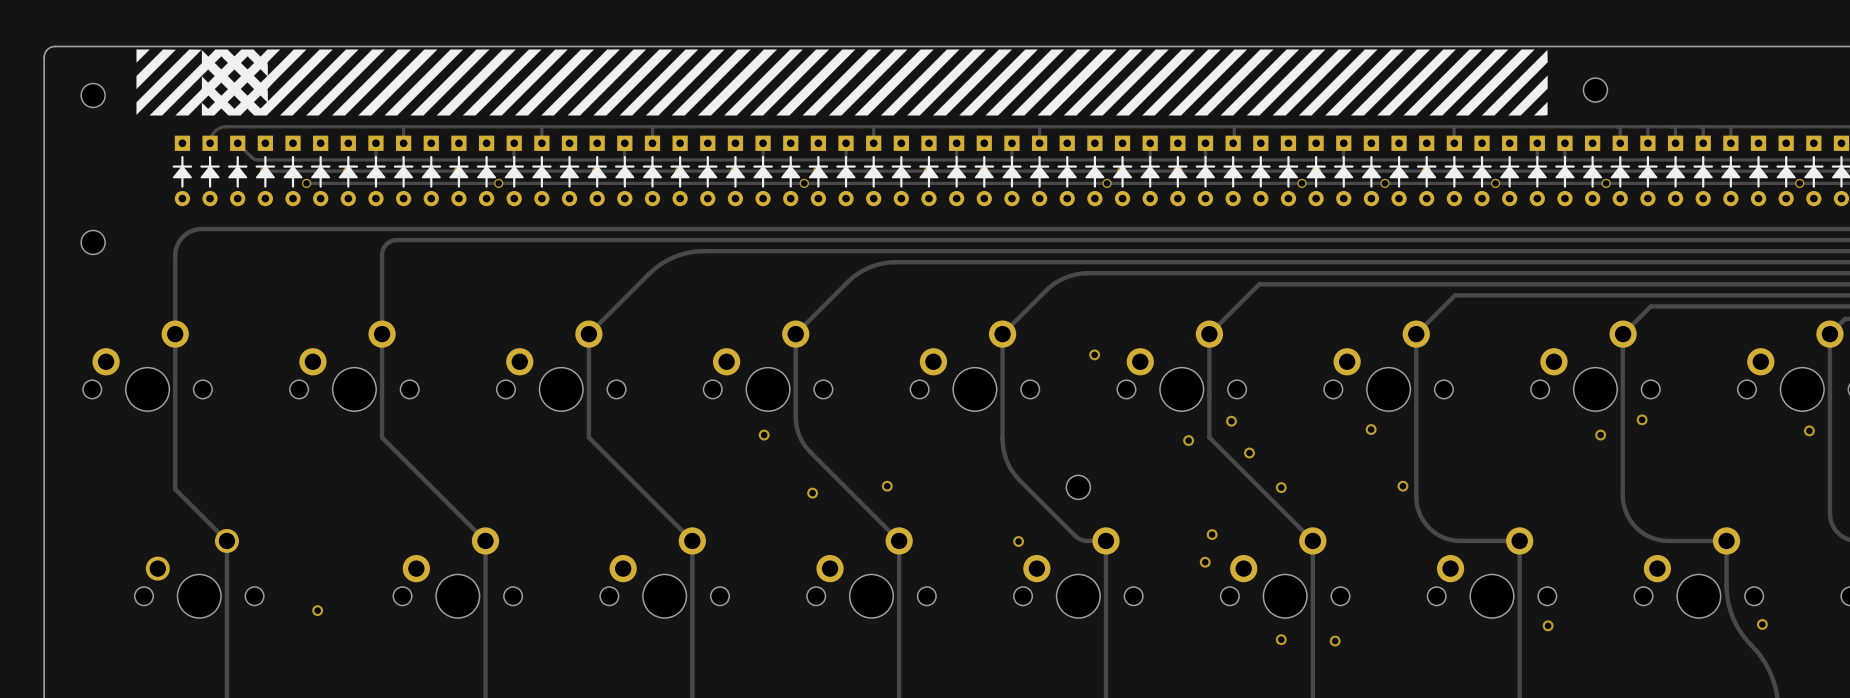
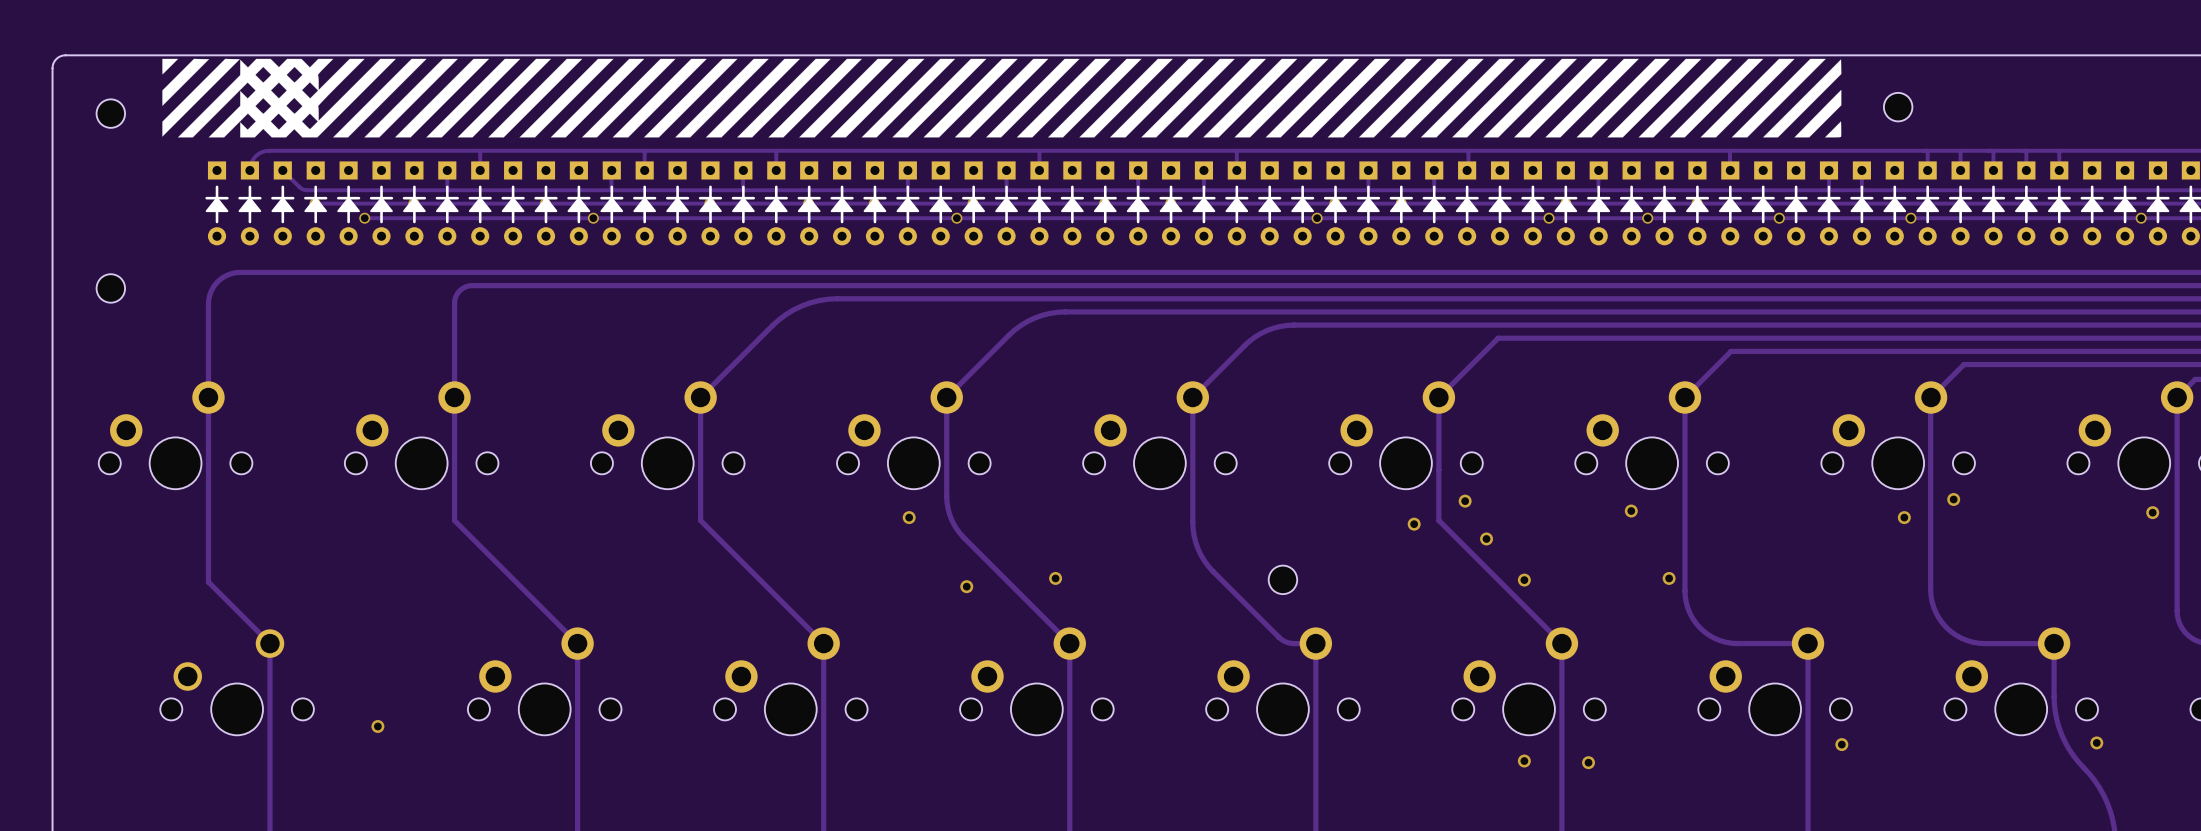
via: (1094, 354) -> none
via: (1212, 534) -> none
via: (1018, 541) -> none
via: (1205, 562) -> none

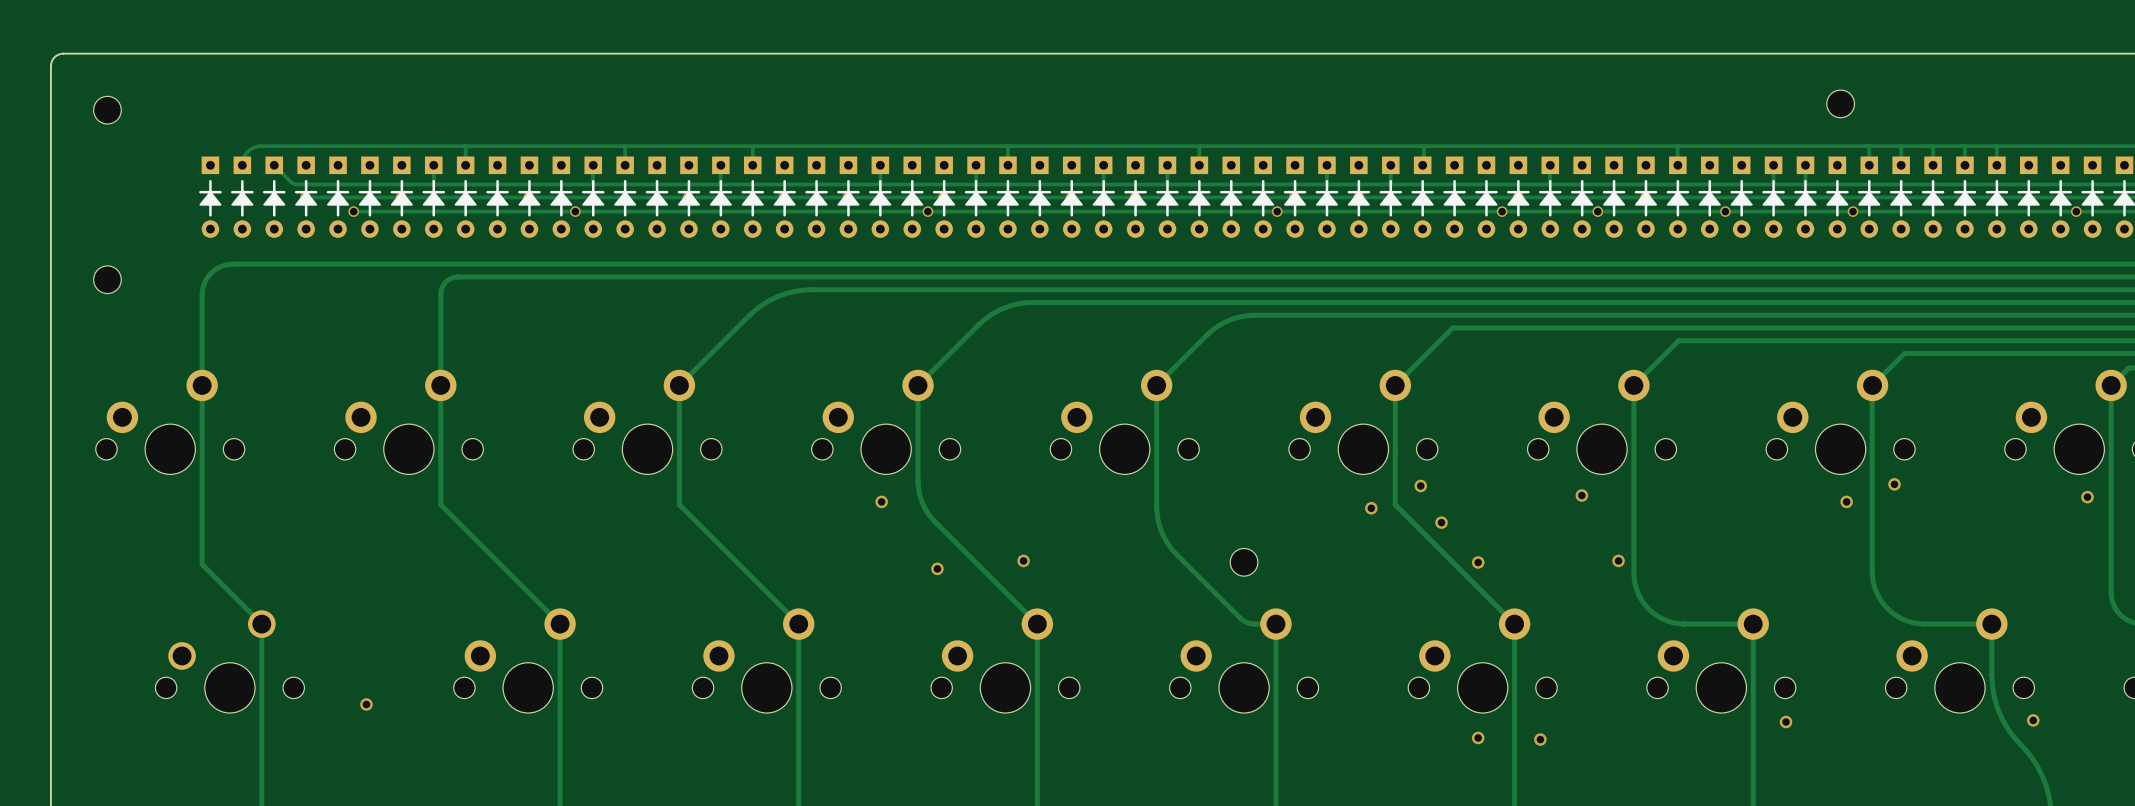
drawing: [162, 58, 1842, 138] -> none

